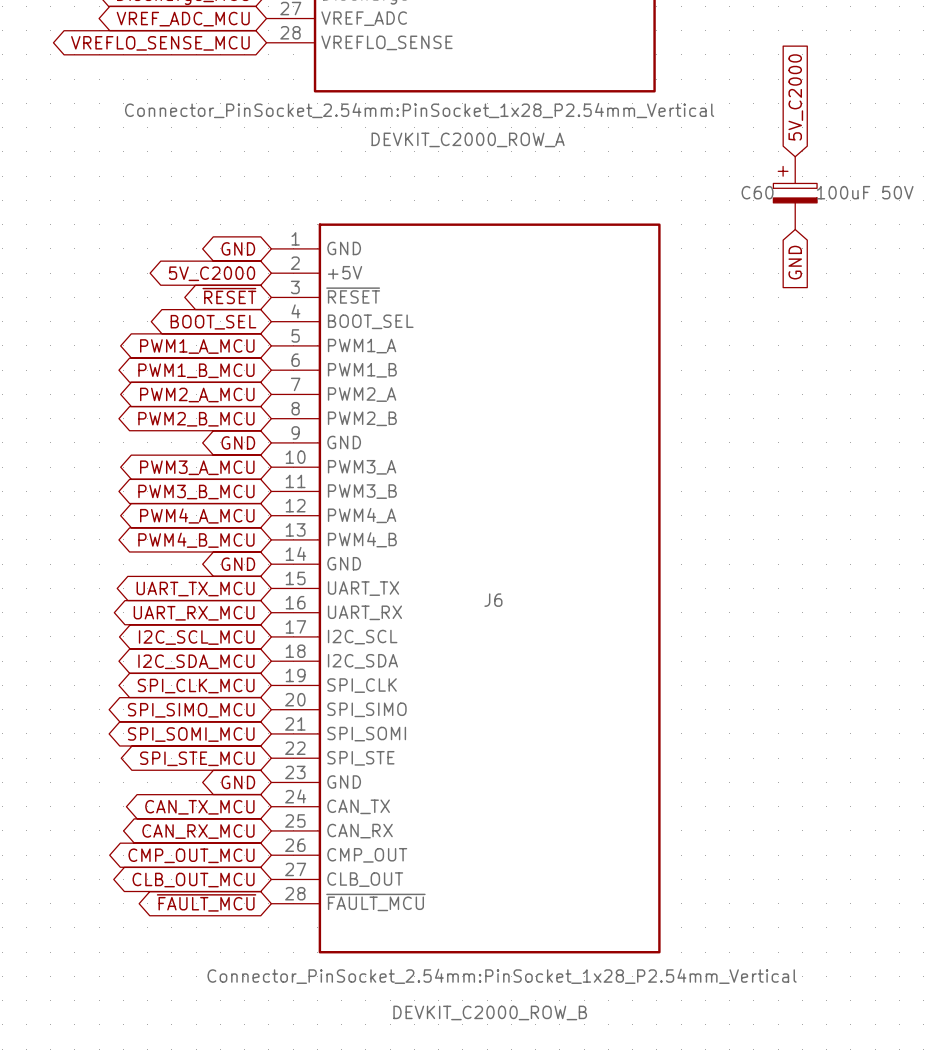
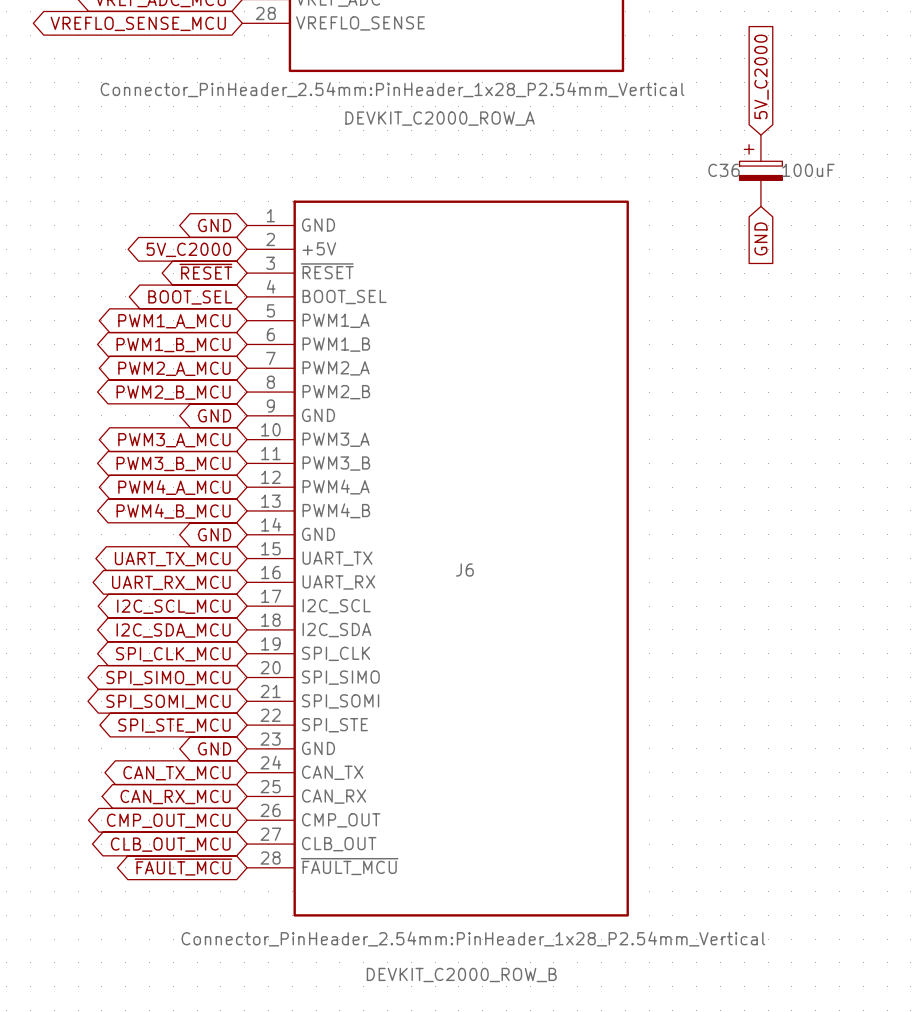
part text: Connector_PinSocket_2.54mm:PinSocket_1x28_P2.54mm_Vertical (419, 110) -> Connector_PinHeader_2.54mm:PinHeader_1x28_P2.54mm_Vertical (392, 89)
C60 name: C60 (757, 192) -> C36 (724, 170)
C60 value: 100uF 50V (865, 192) -> 100uF (808, 170)
J6 text: Connector_PinSocket_2.54mm:PinSocket_1x28_P2.54mm_Vertical (502, 976) -> Connector_PinHeader_2.54mm:PinHeader_1x28_P2.54mm_Vertical (473, 939)

